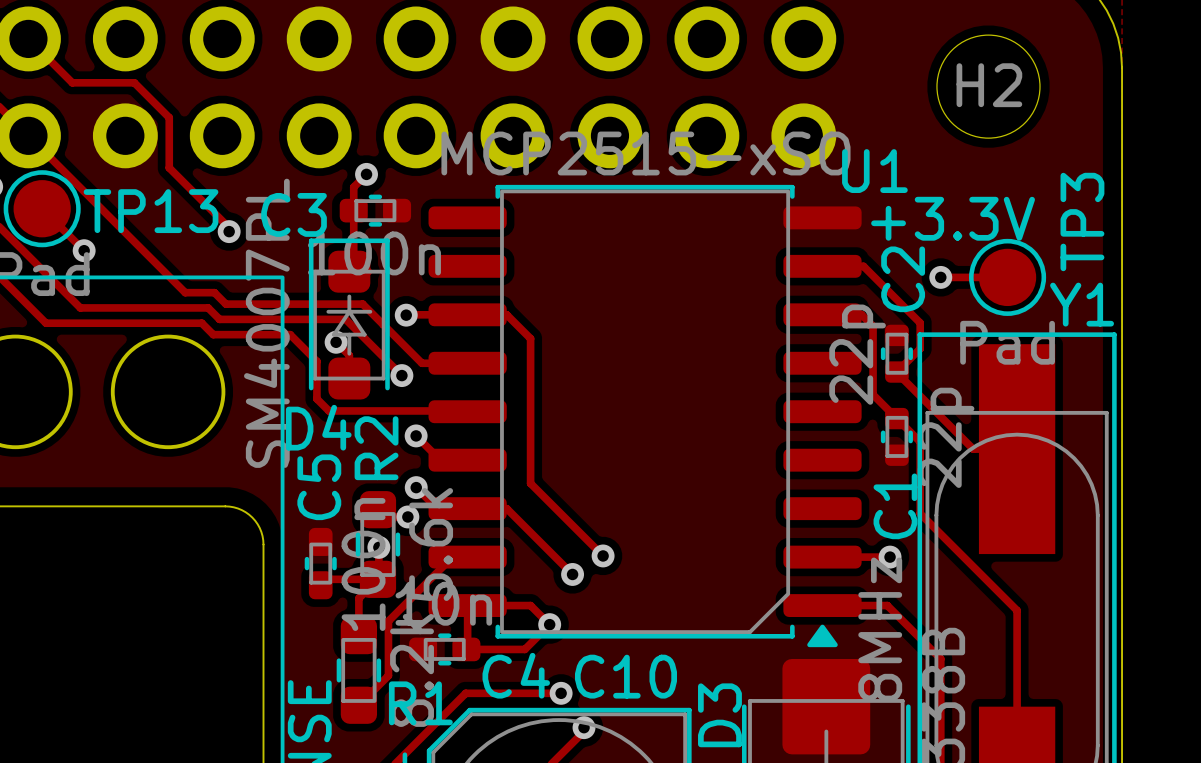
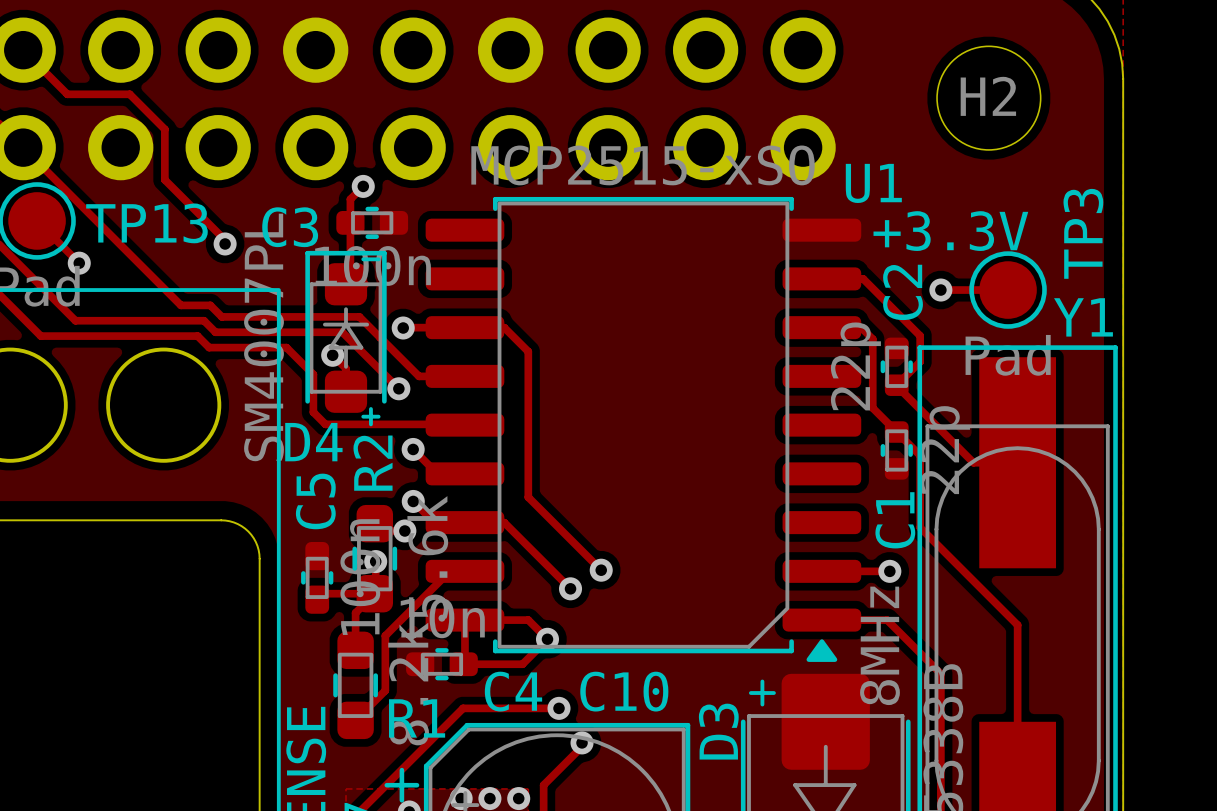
line: none -> (363, 259) (378, 259)
line: none -> (370, 409) (370, 424)
line: none -> (363, 416) (378, 416)
line: none -> (762, 681) (762, 704)
line: none -> (750, 693) (773, 693)

